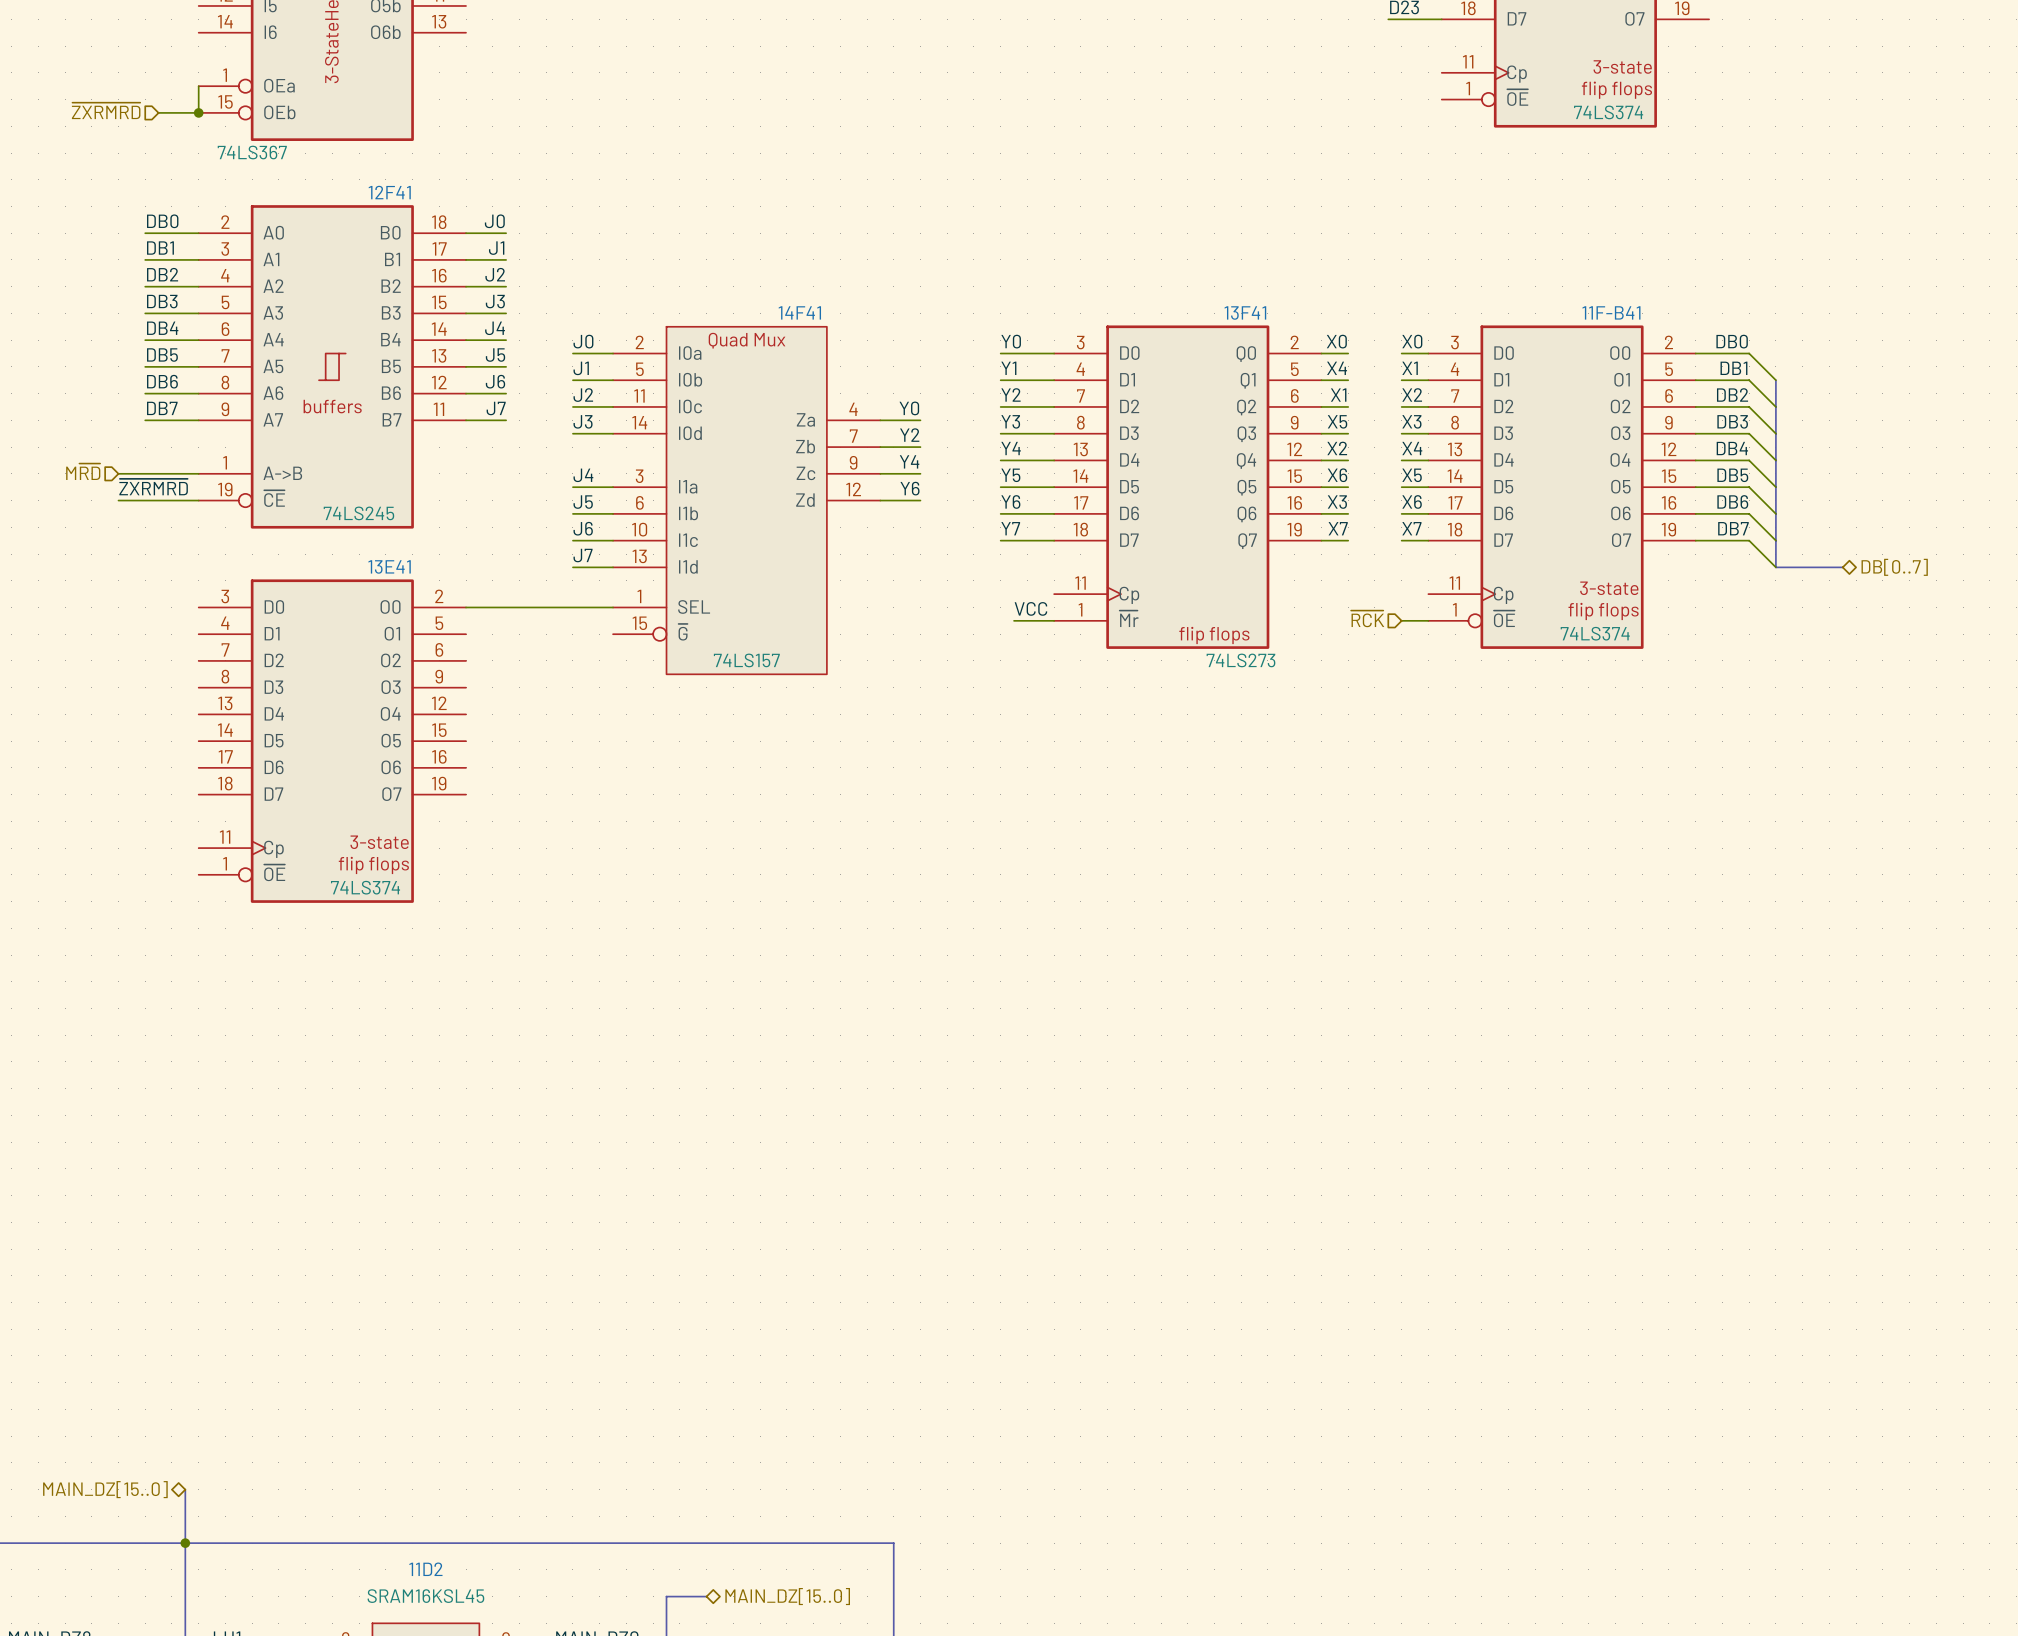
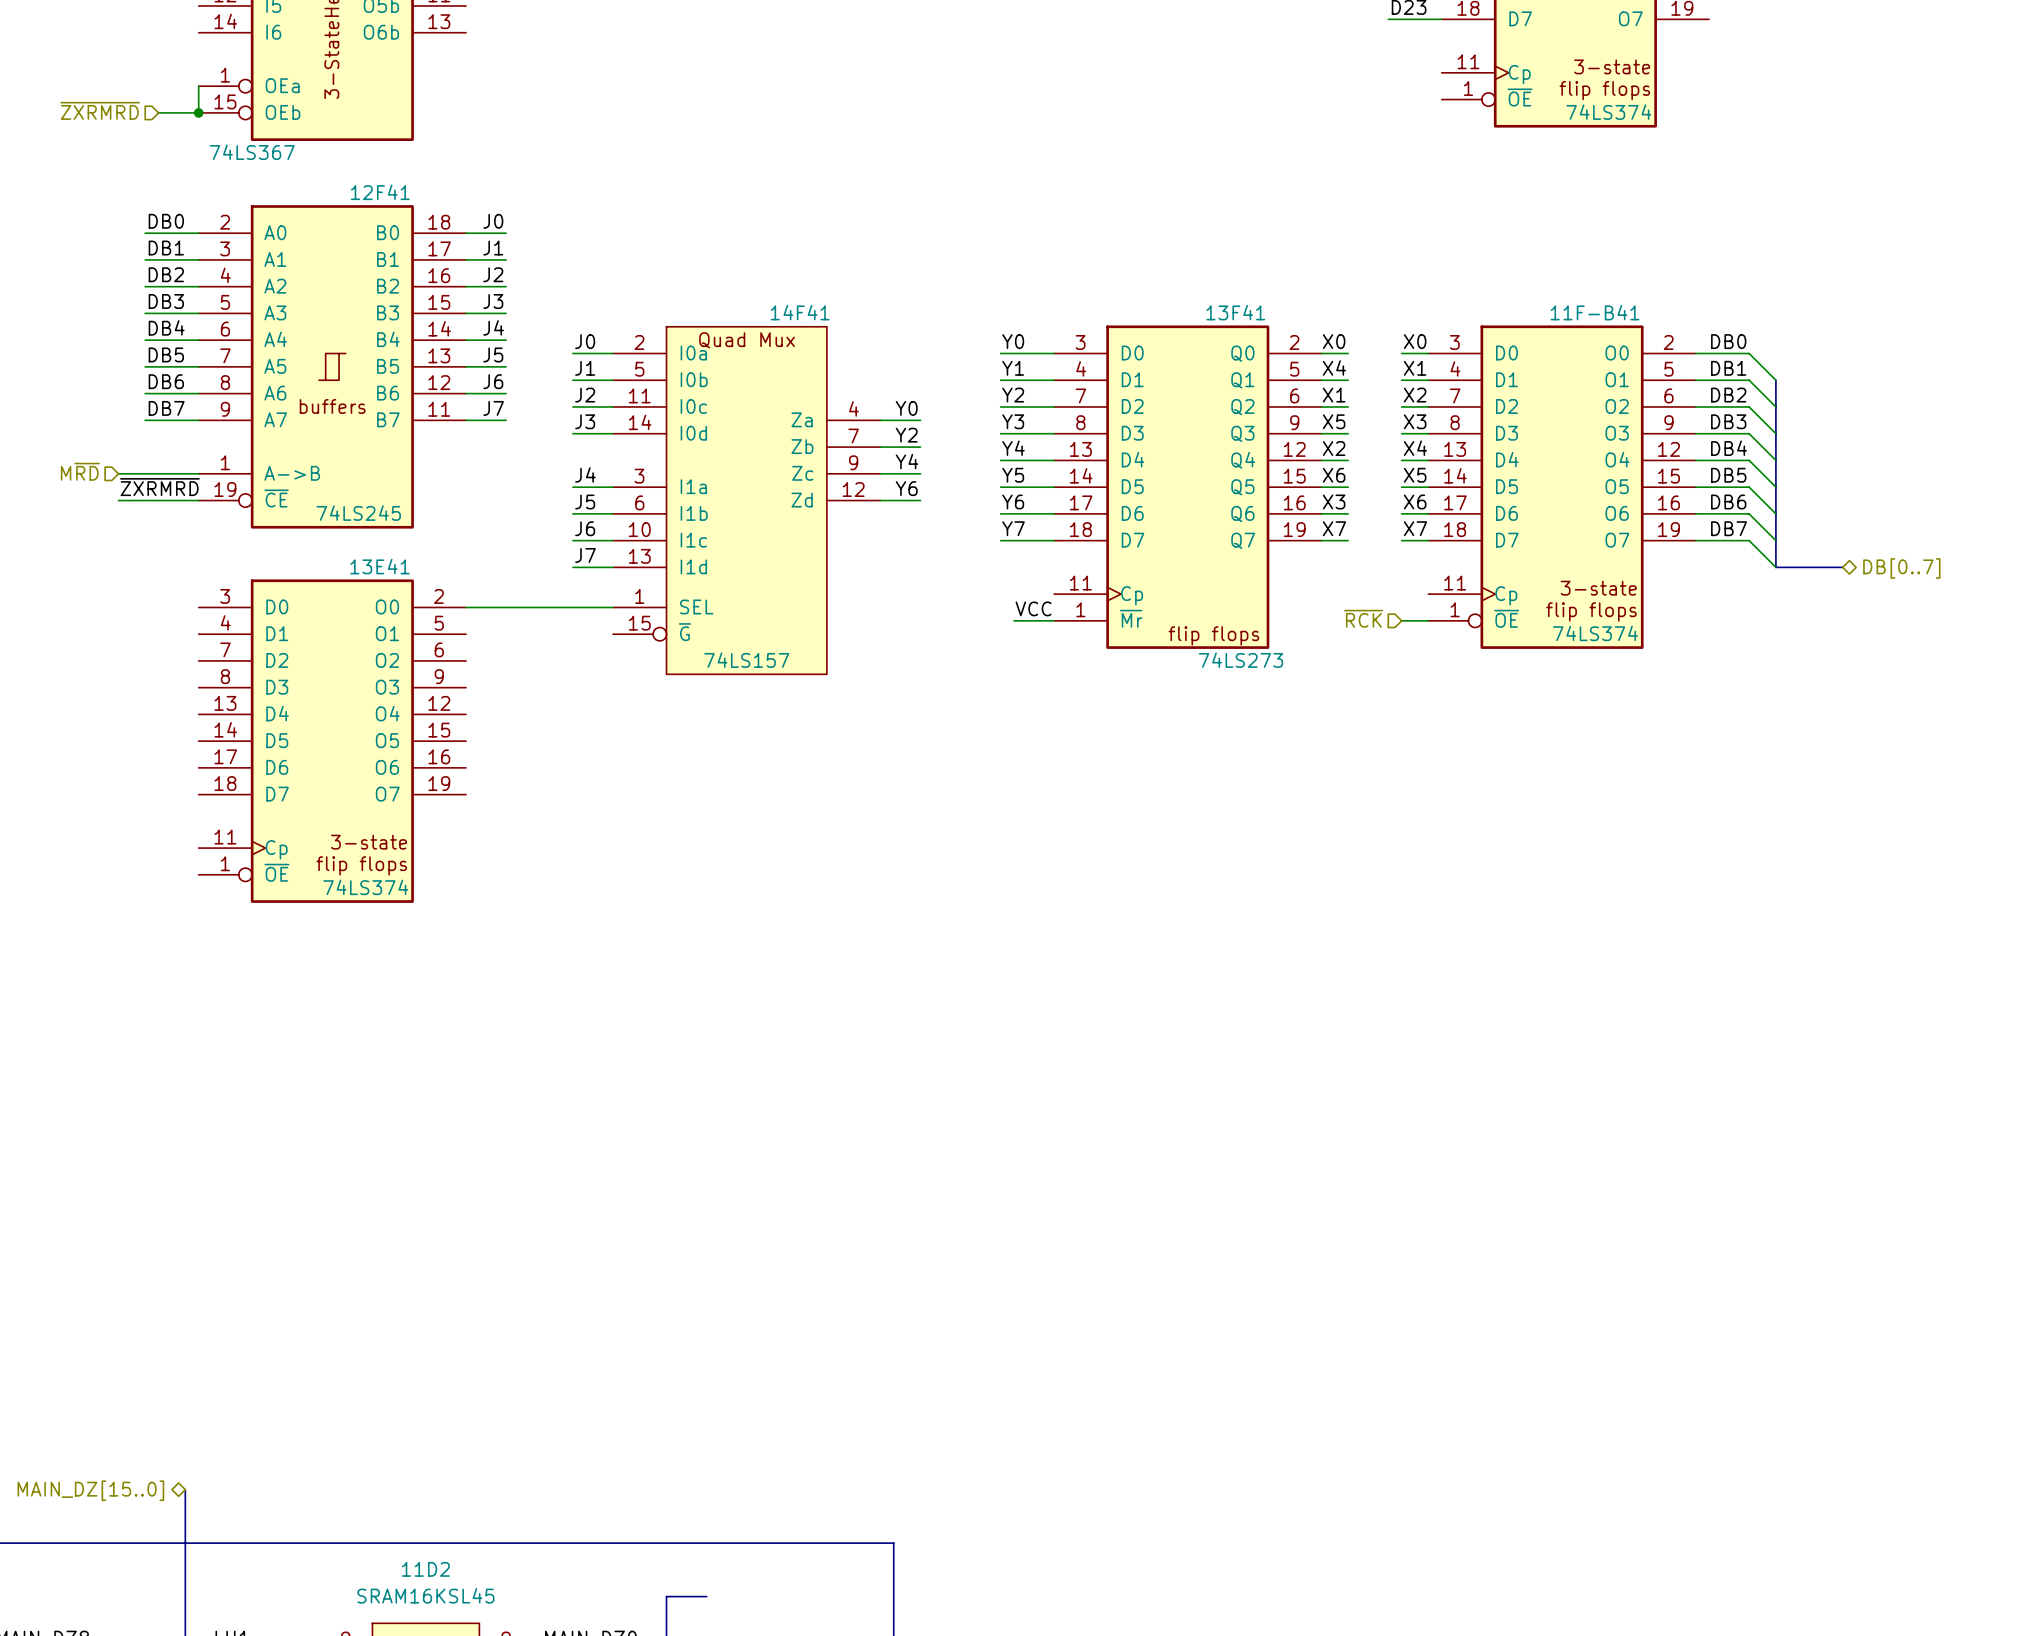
junction: (185, 1543) -> none
hierarchical label: MAIN_DZ[15..0] (787, 1596) -> none

